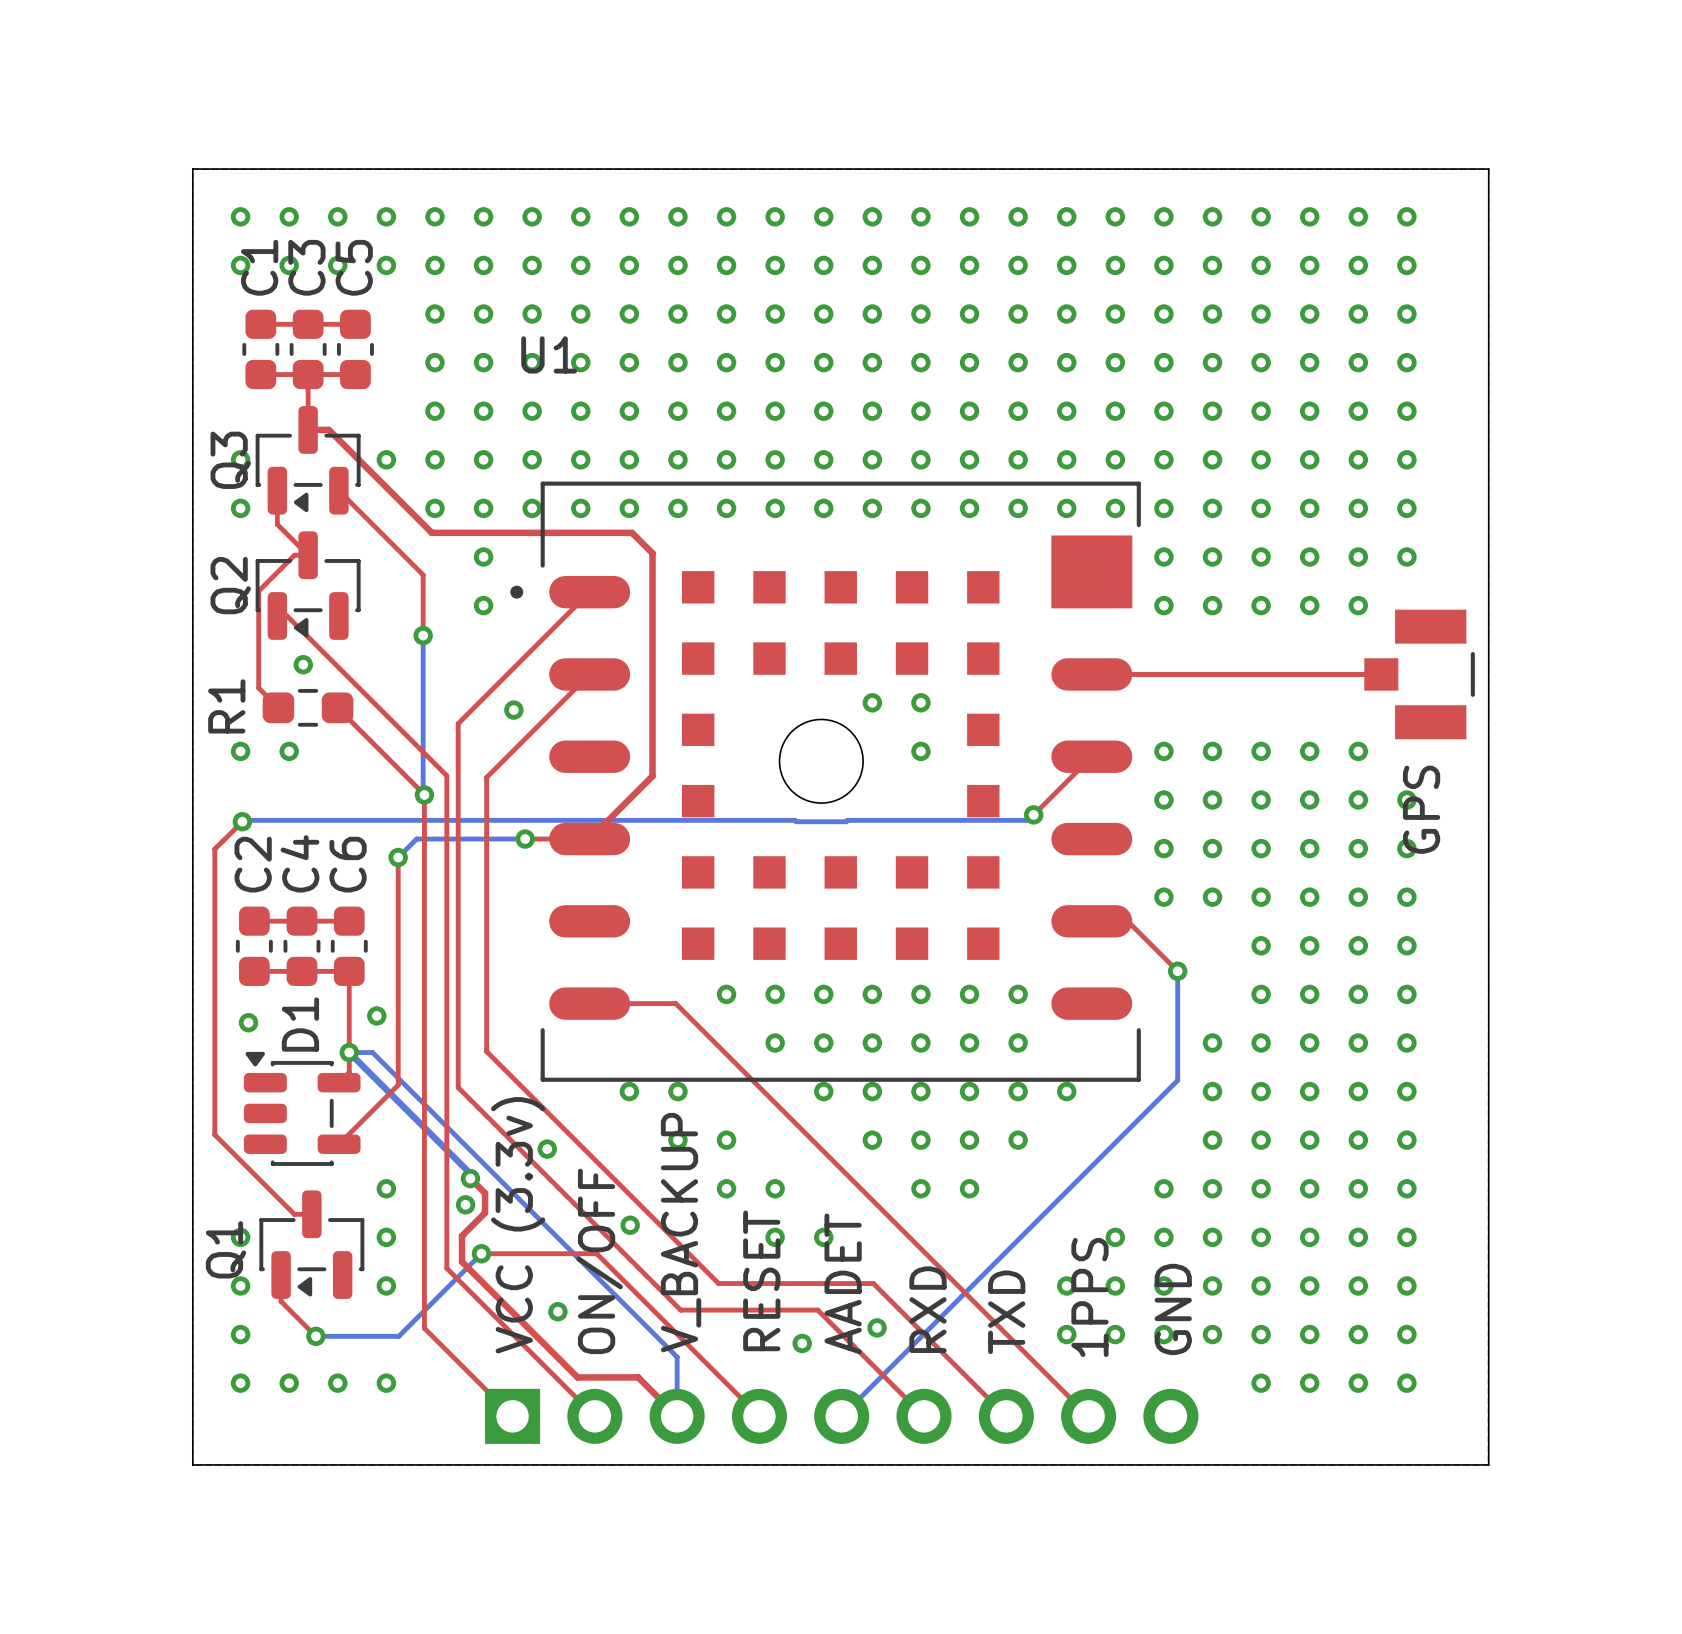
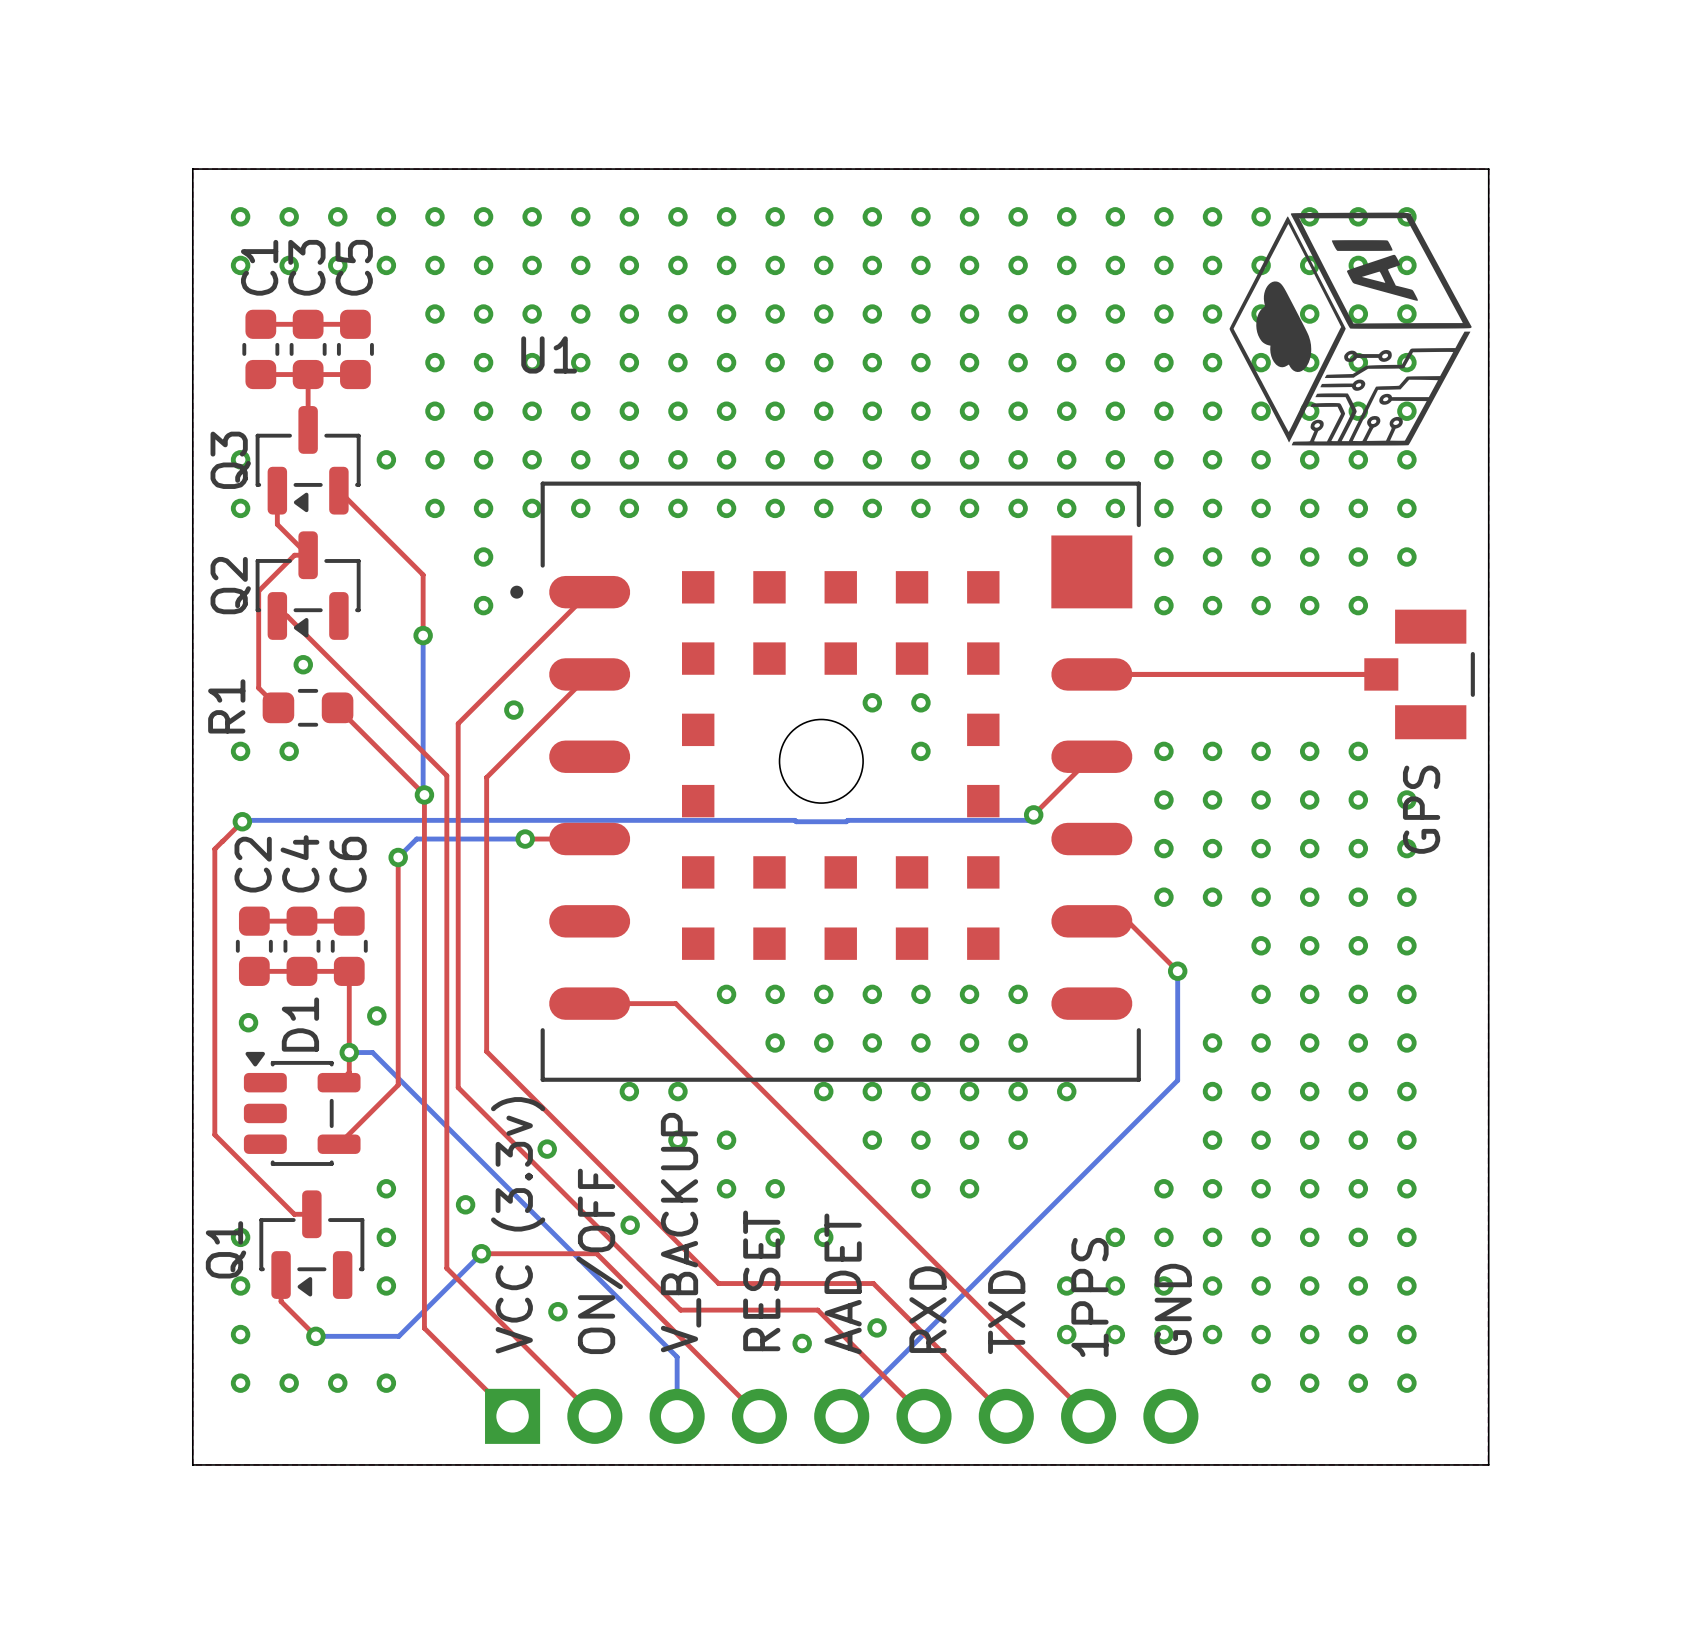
drawing: none -> [1229, 212, 1472, 446]
top track: (308, 429) (328, 429) (431, 532) (632, 532) (652, 553) (652, 776) (589, 839) -> none
bottom track: (349, 1052) (470, 1173) (470, 1178) -> none
top track: (470, 1178) (485, 1193) (485, 1212) (461, 1235) (461, 1261) (577, 1377) (638, 1377) (677, 1416) -> none
via: (470, 1178) -> none

